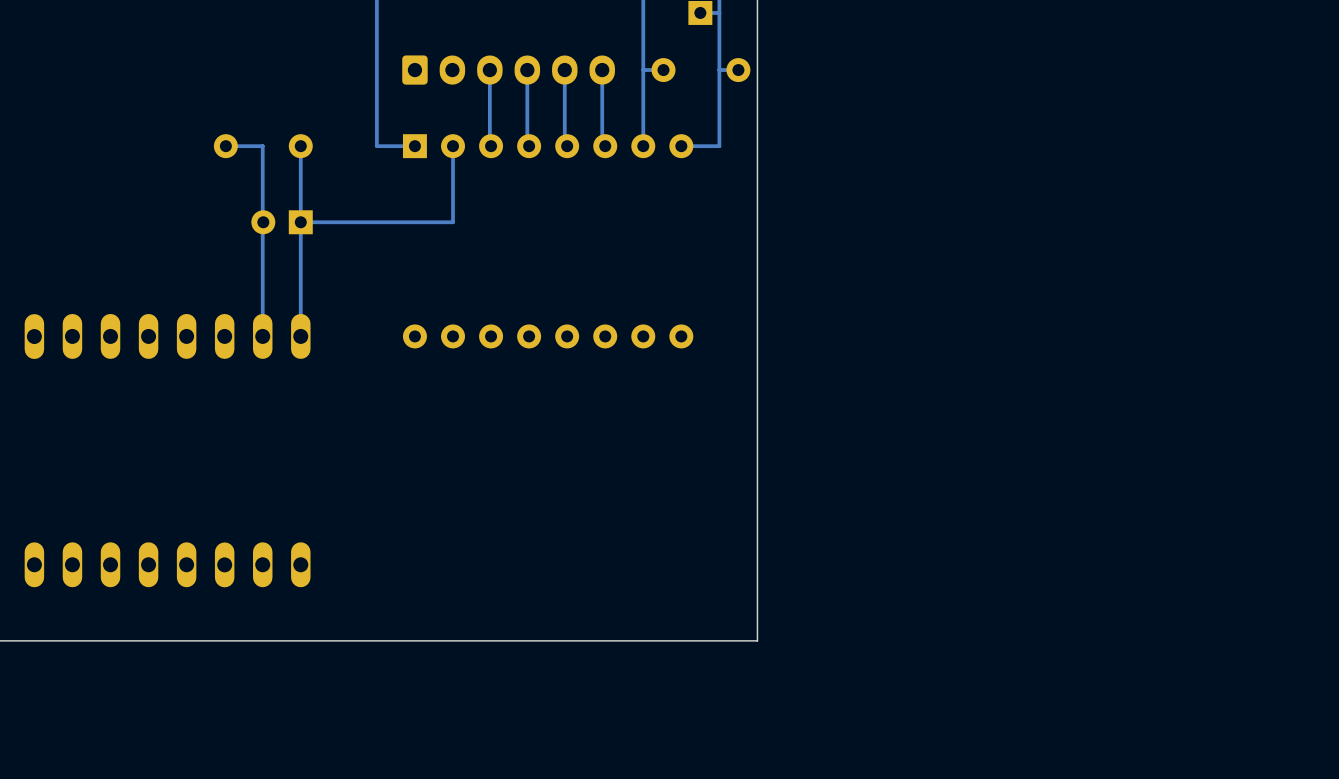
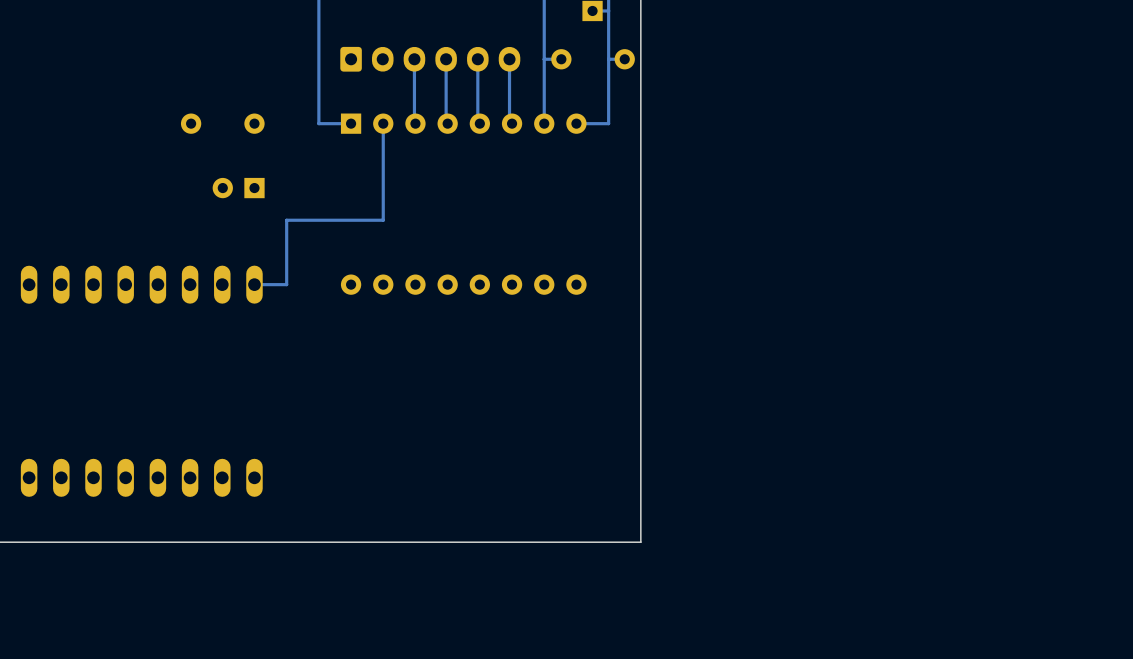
track: (225, 146) (262, 146) (262, 336) -> none
track: (300, 146) (300, 336) -> none
track: (453, 222) (300, 222) -> (383, 188) (383, 220) (286, 220) (286, 284) (254, 284)

